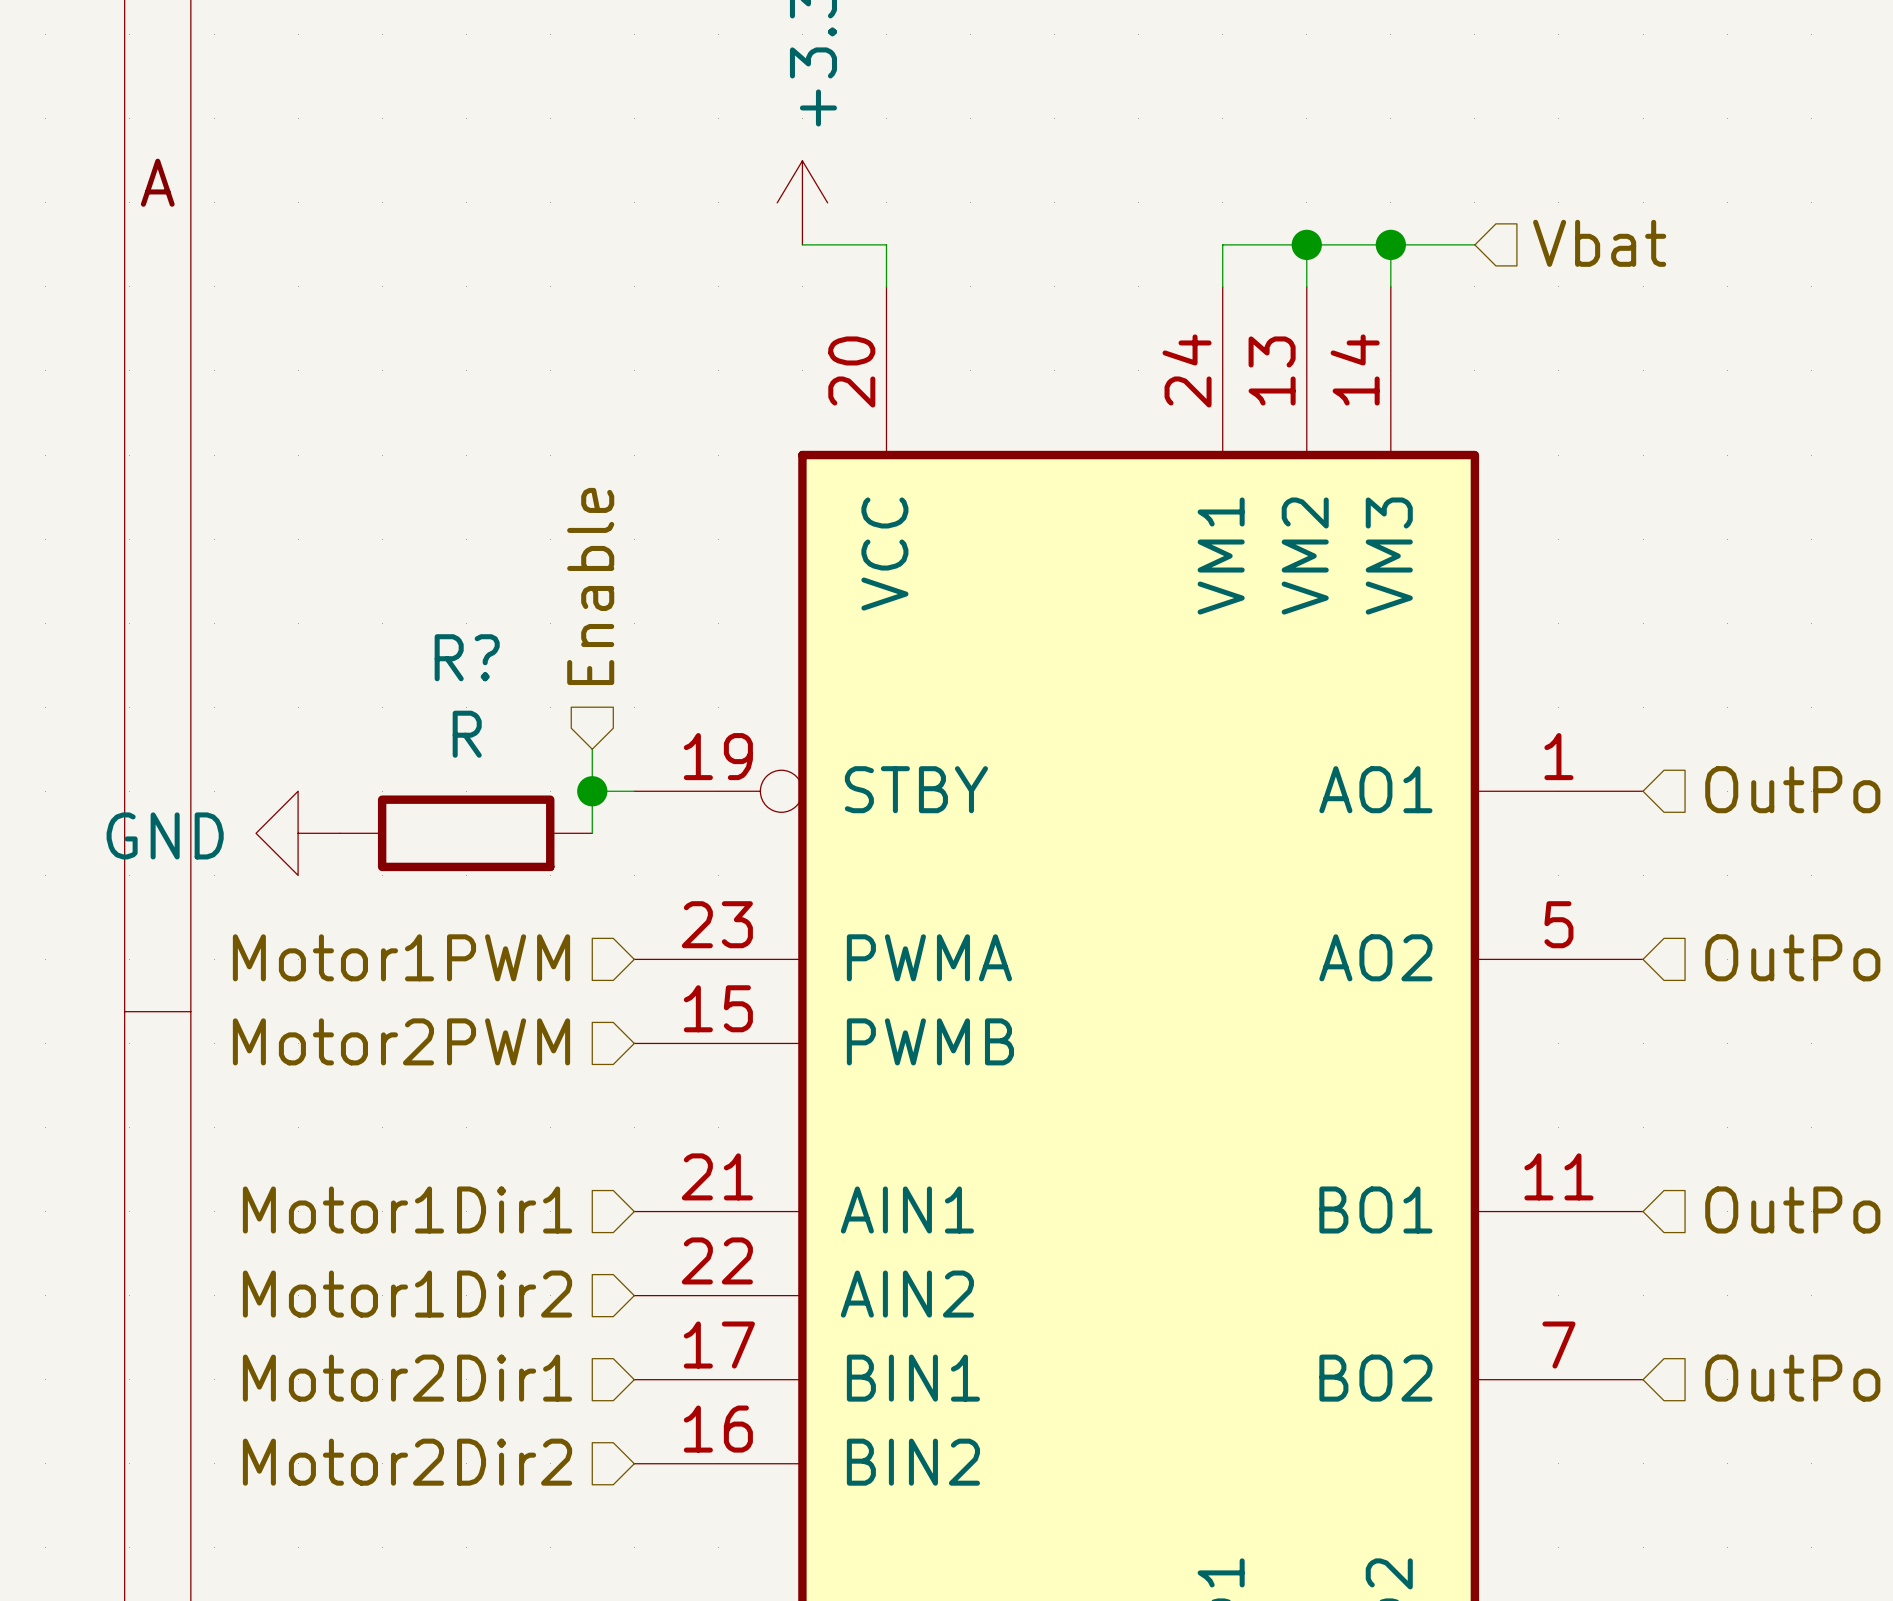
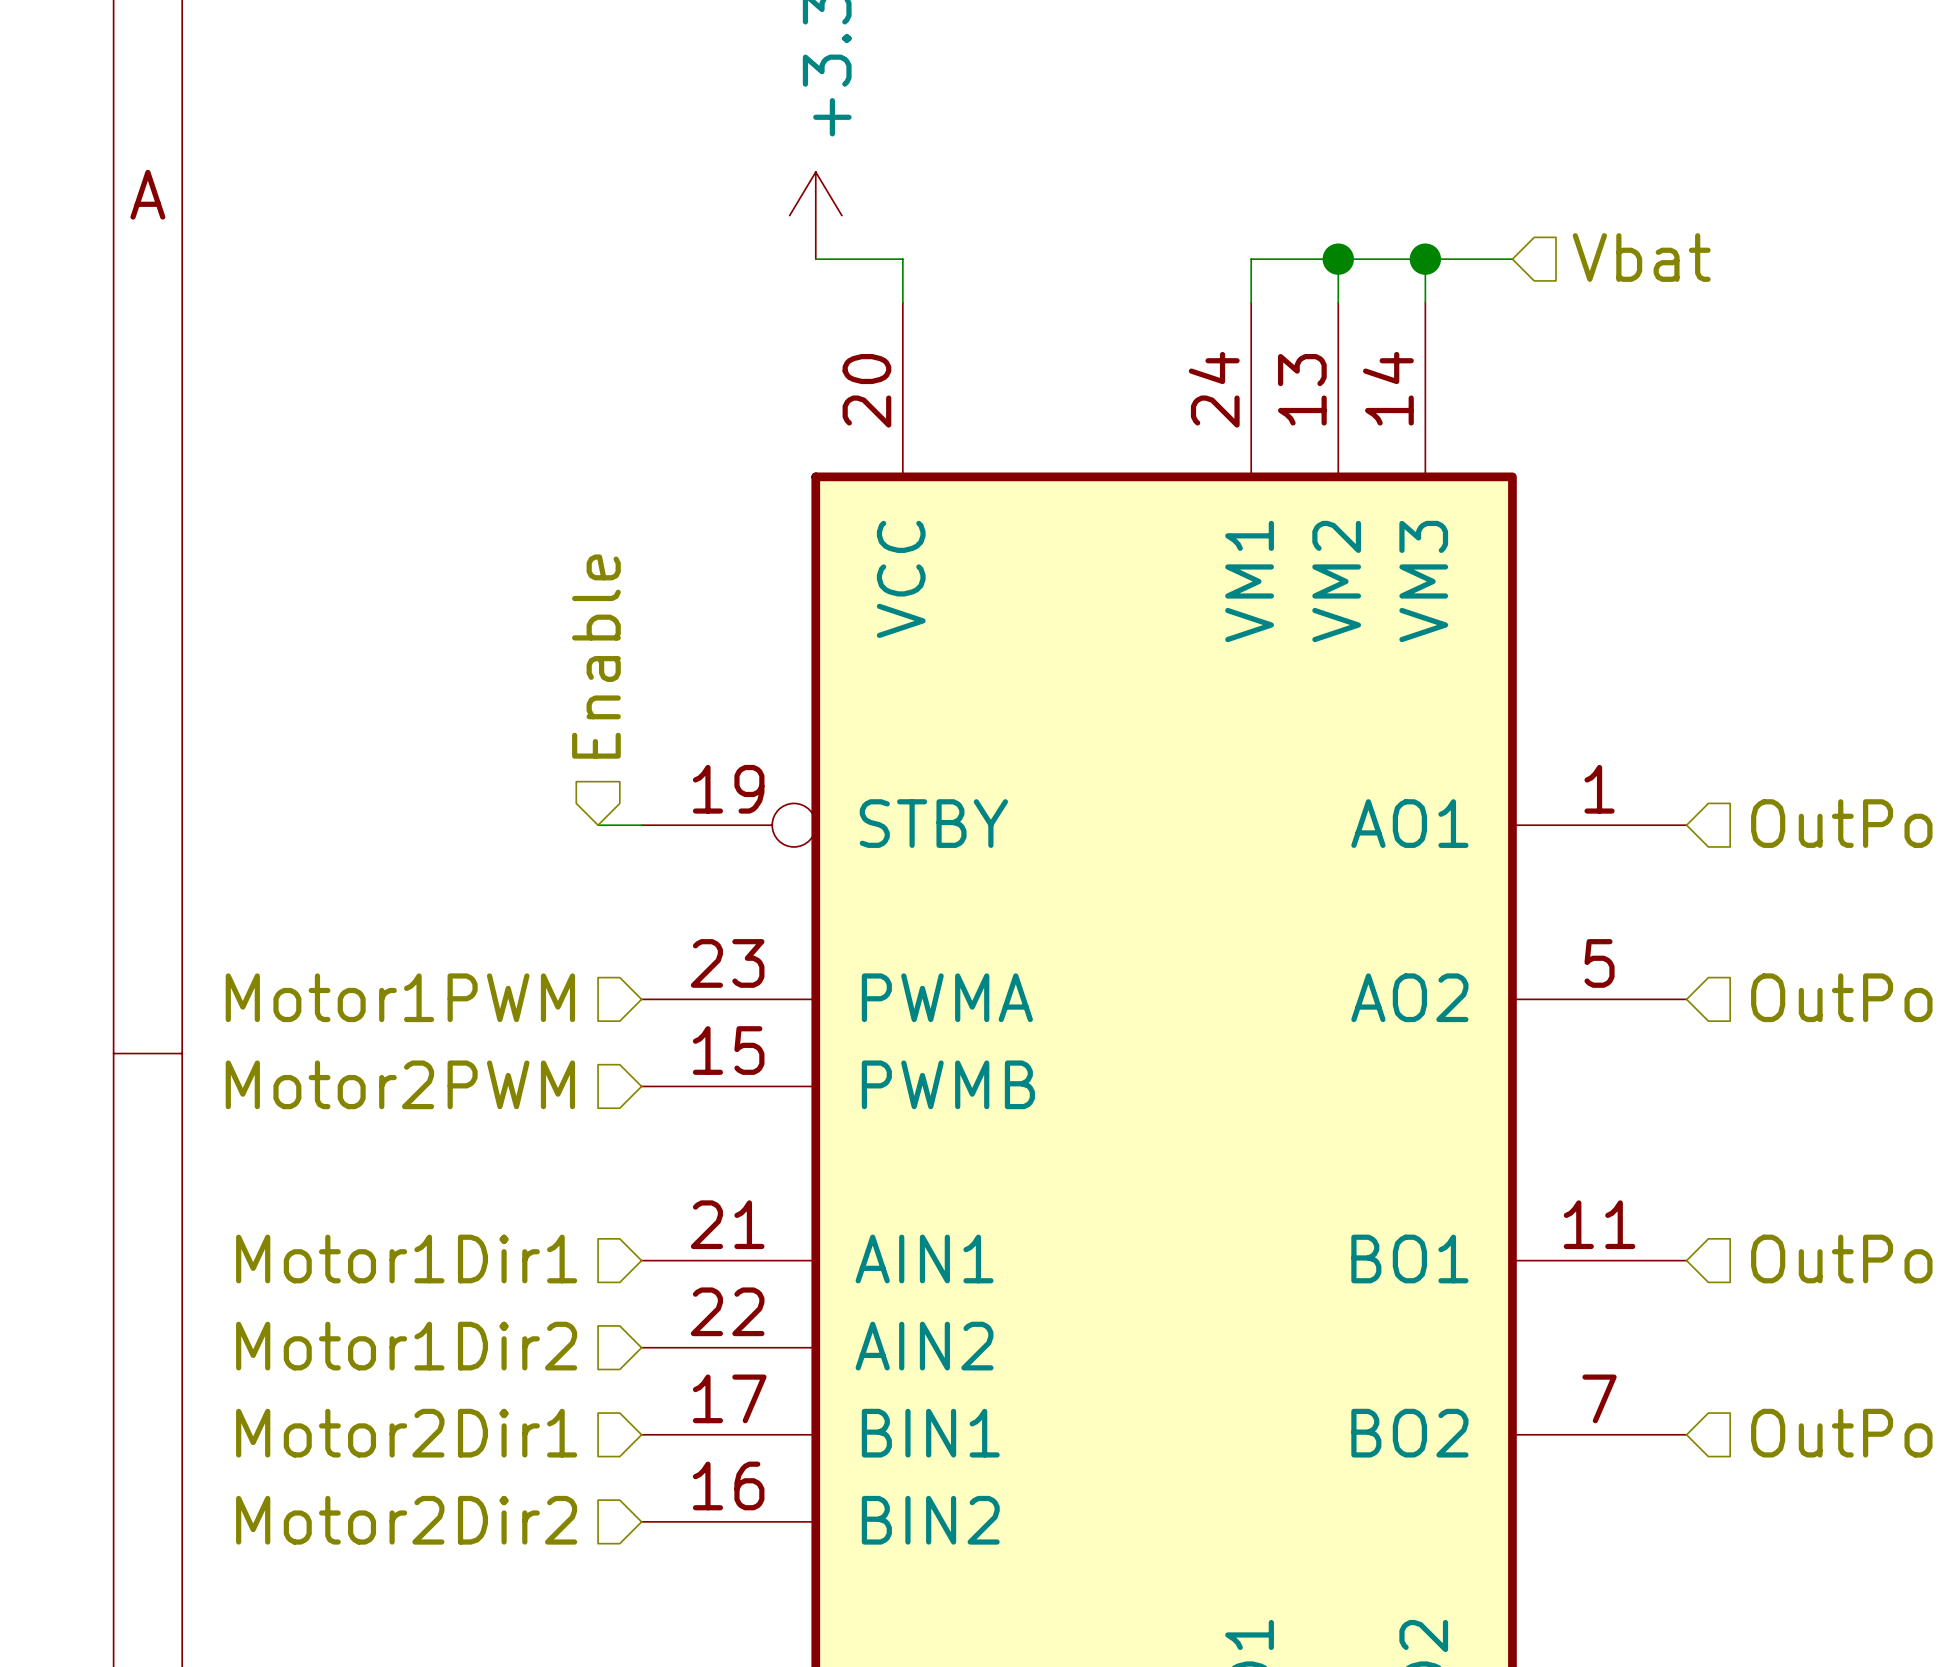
hierarchical label position: Enable (590, 586) -> Enable (596, 656)
wire: (592, 749) (592, 833) -> none
junction: (592, 791) -> none
power symbol: GND (298, 833) -> none
R?: R (466, 833) -> none

